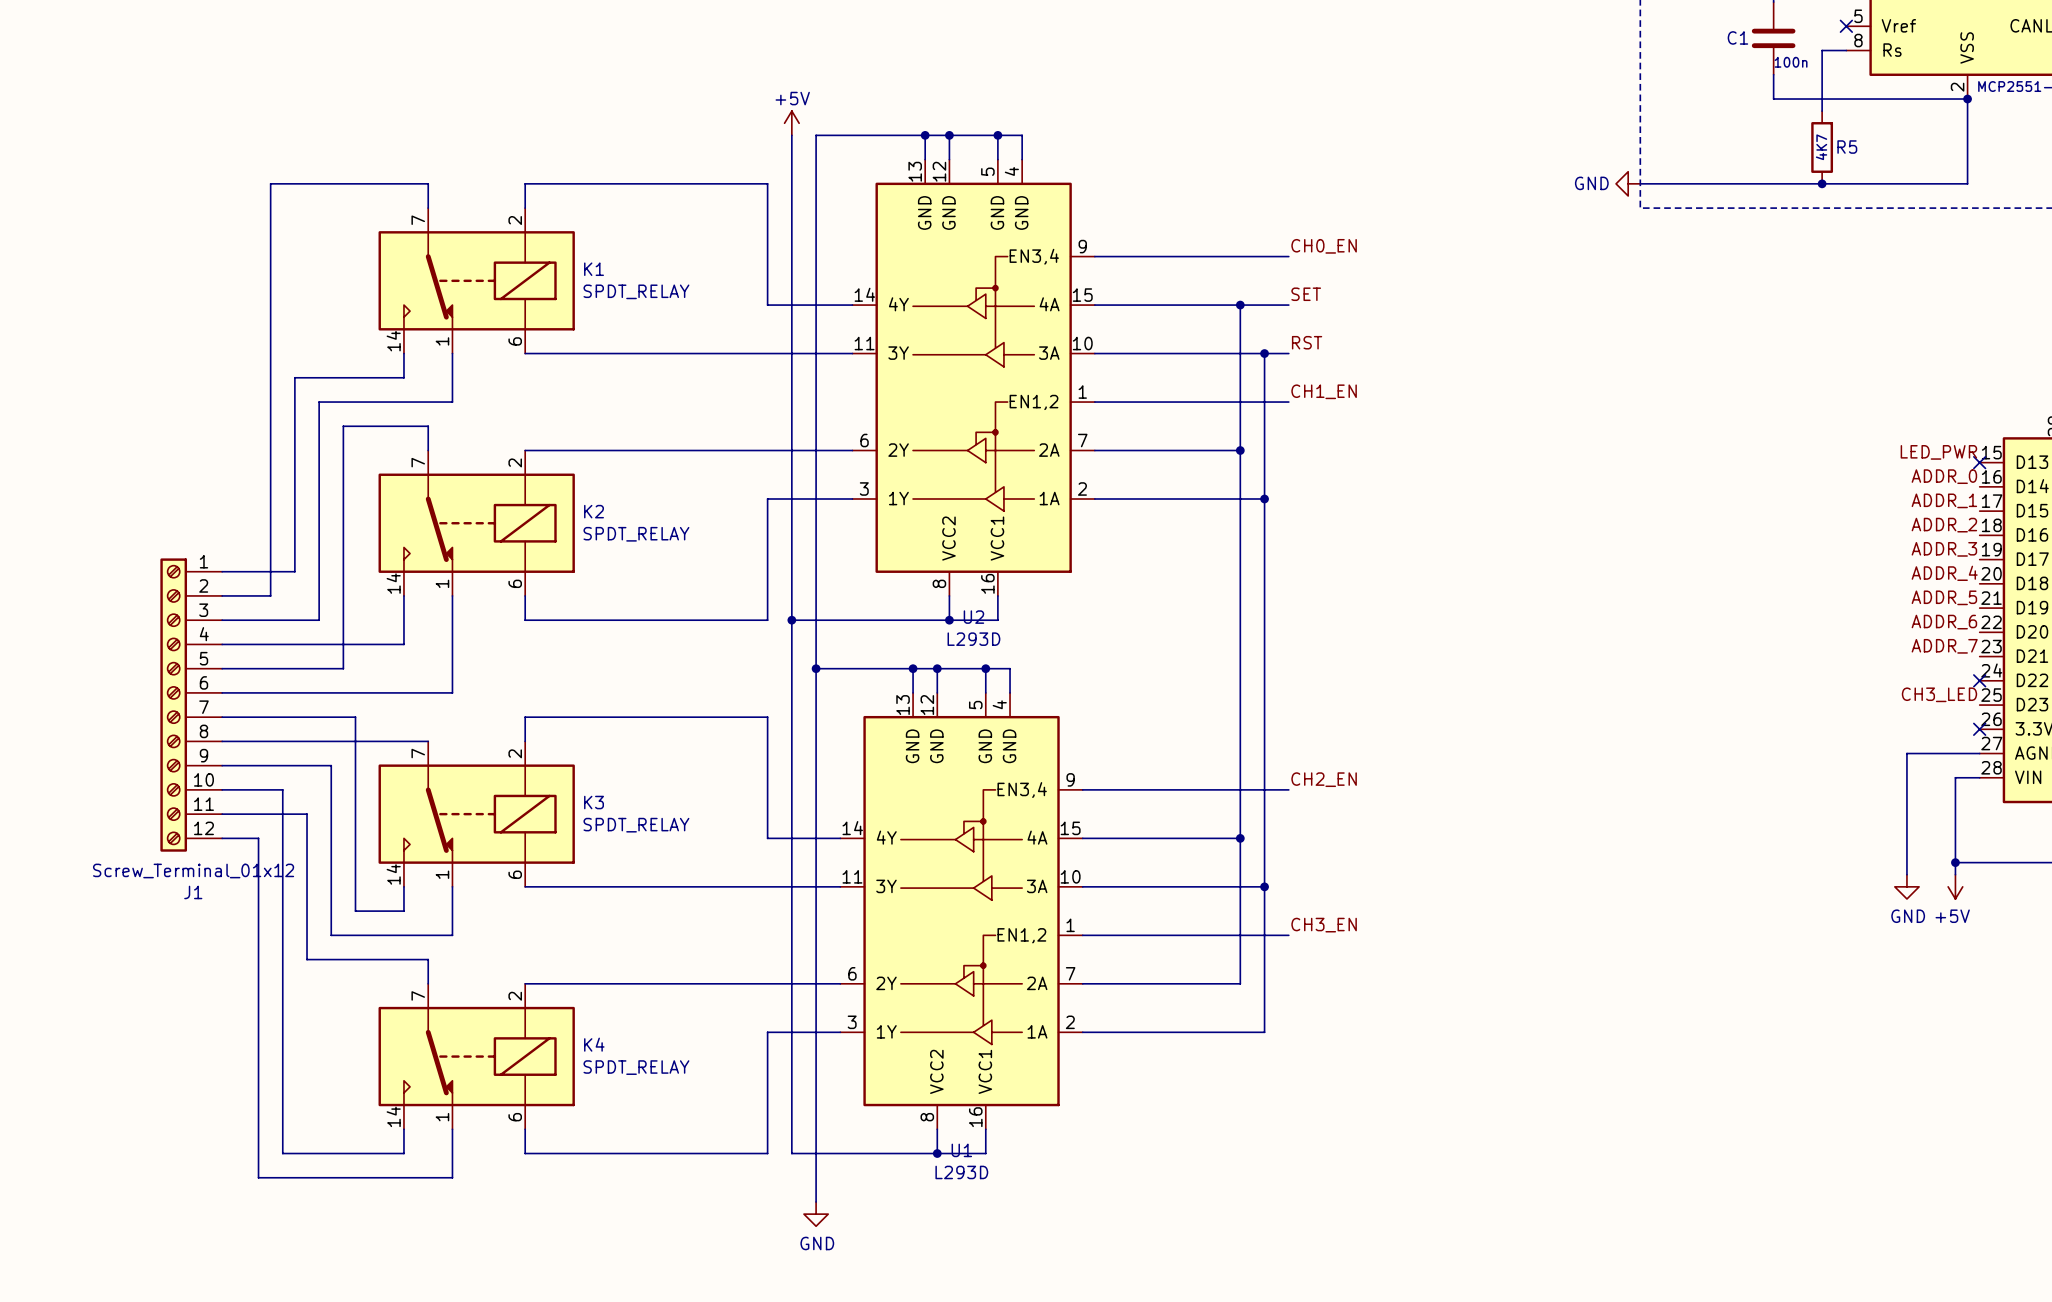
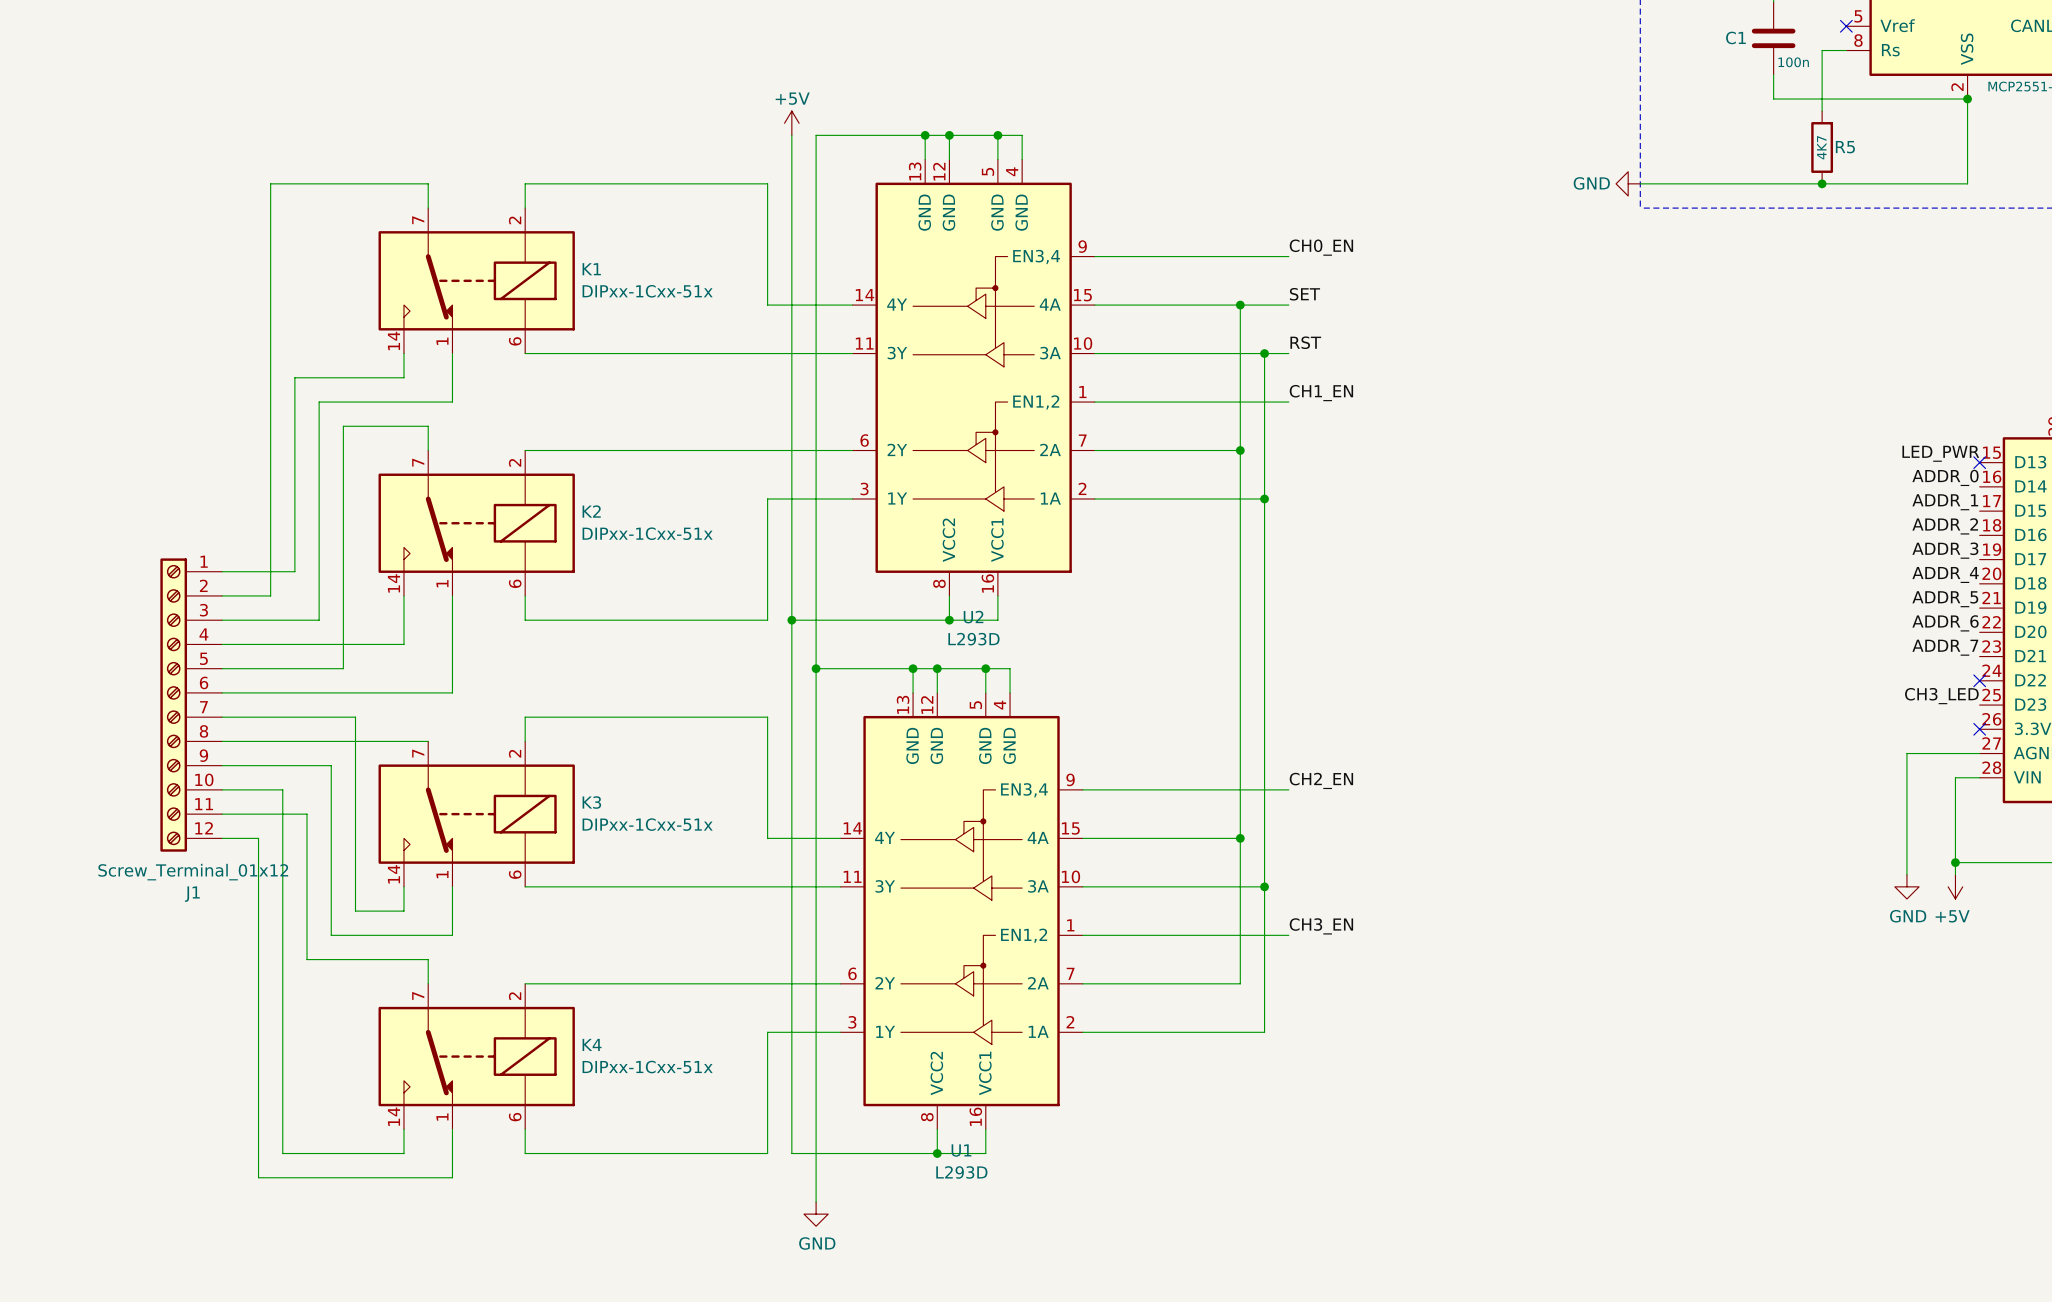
K1 value: SPDT_RELAY (636, 291) -> DIPxx-1Cxx-51x (647, 291)
K2 value: SPDT_RELAY (636, 534) -> DIPxx-1Cxx-51x (647, 533)
K3 value: SPDT_RELAY (636, 825) -> DIPxx-1Cxx-51x (647, 824)
K4 value: SPDT_RELAY (636, 1067) -> DIPxx-1Cxx-51x (647, 1067)

